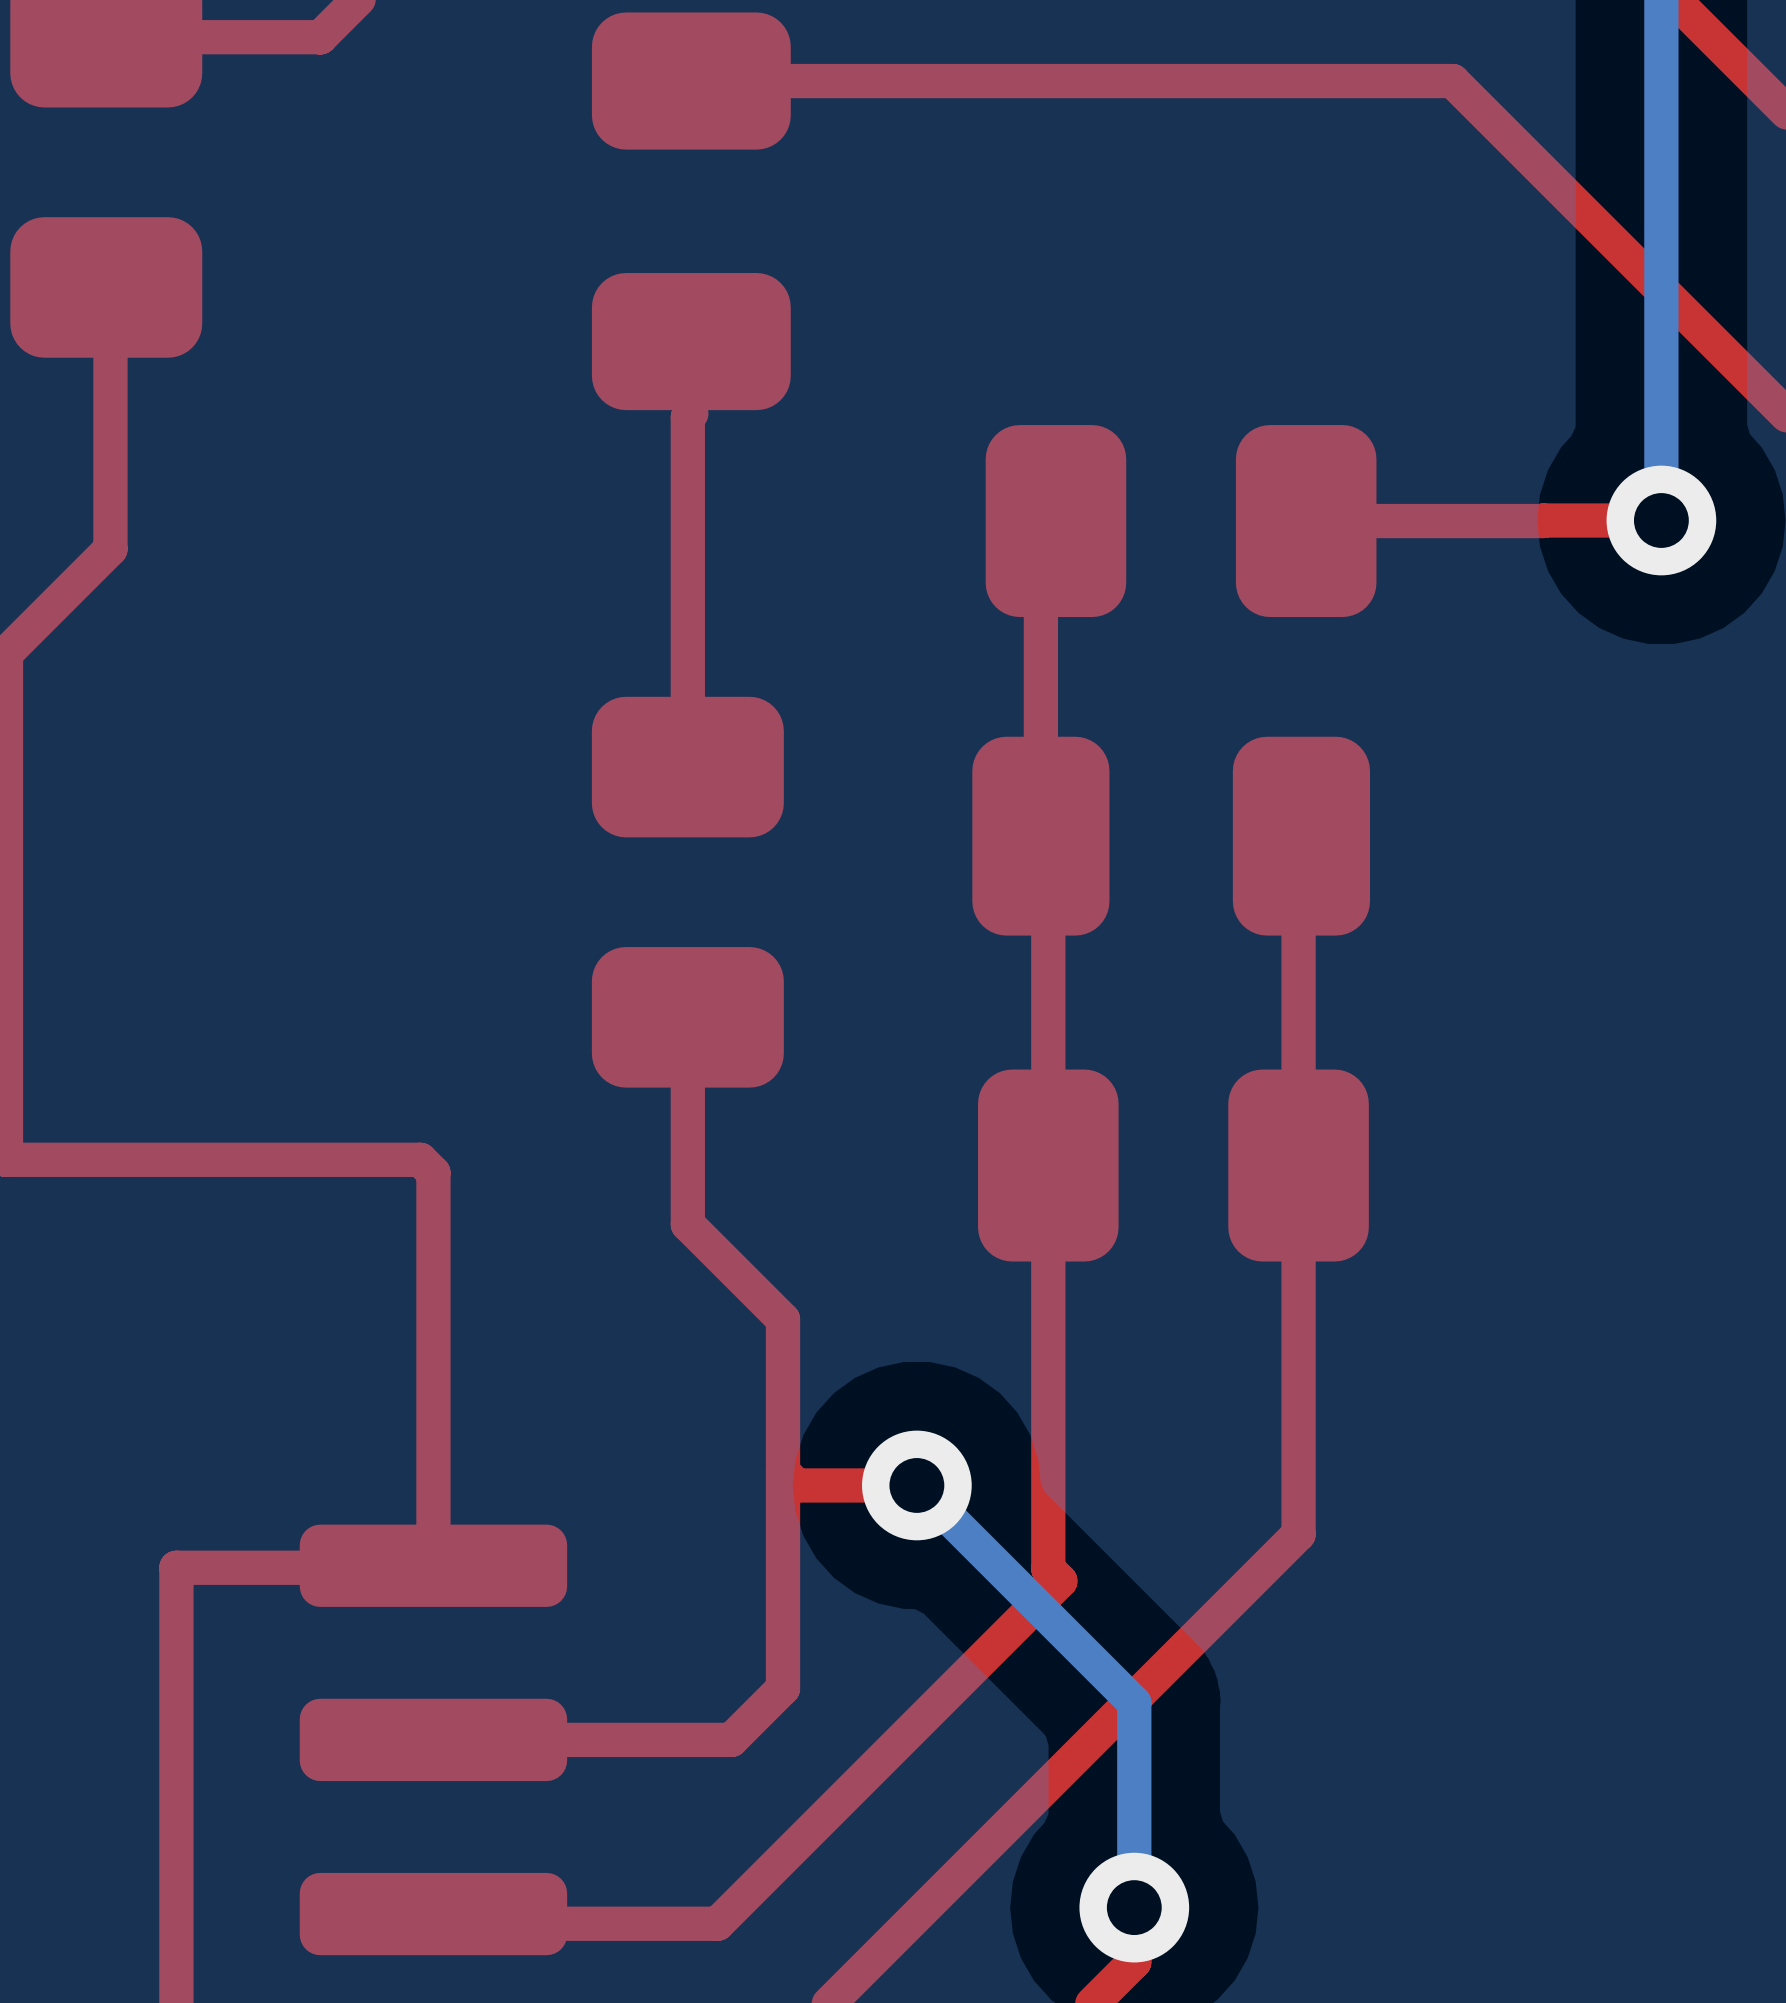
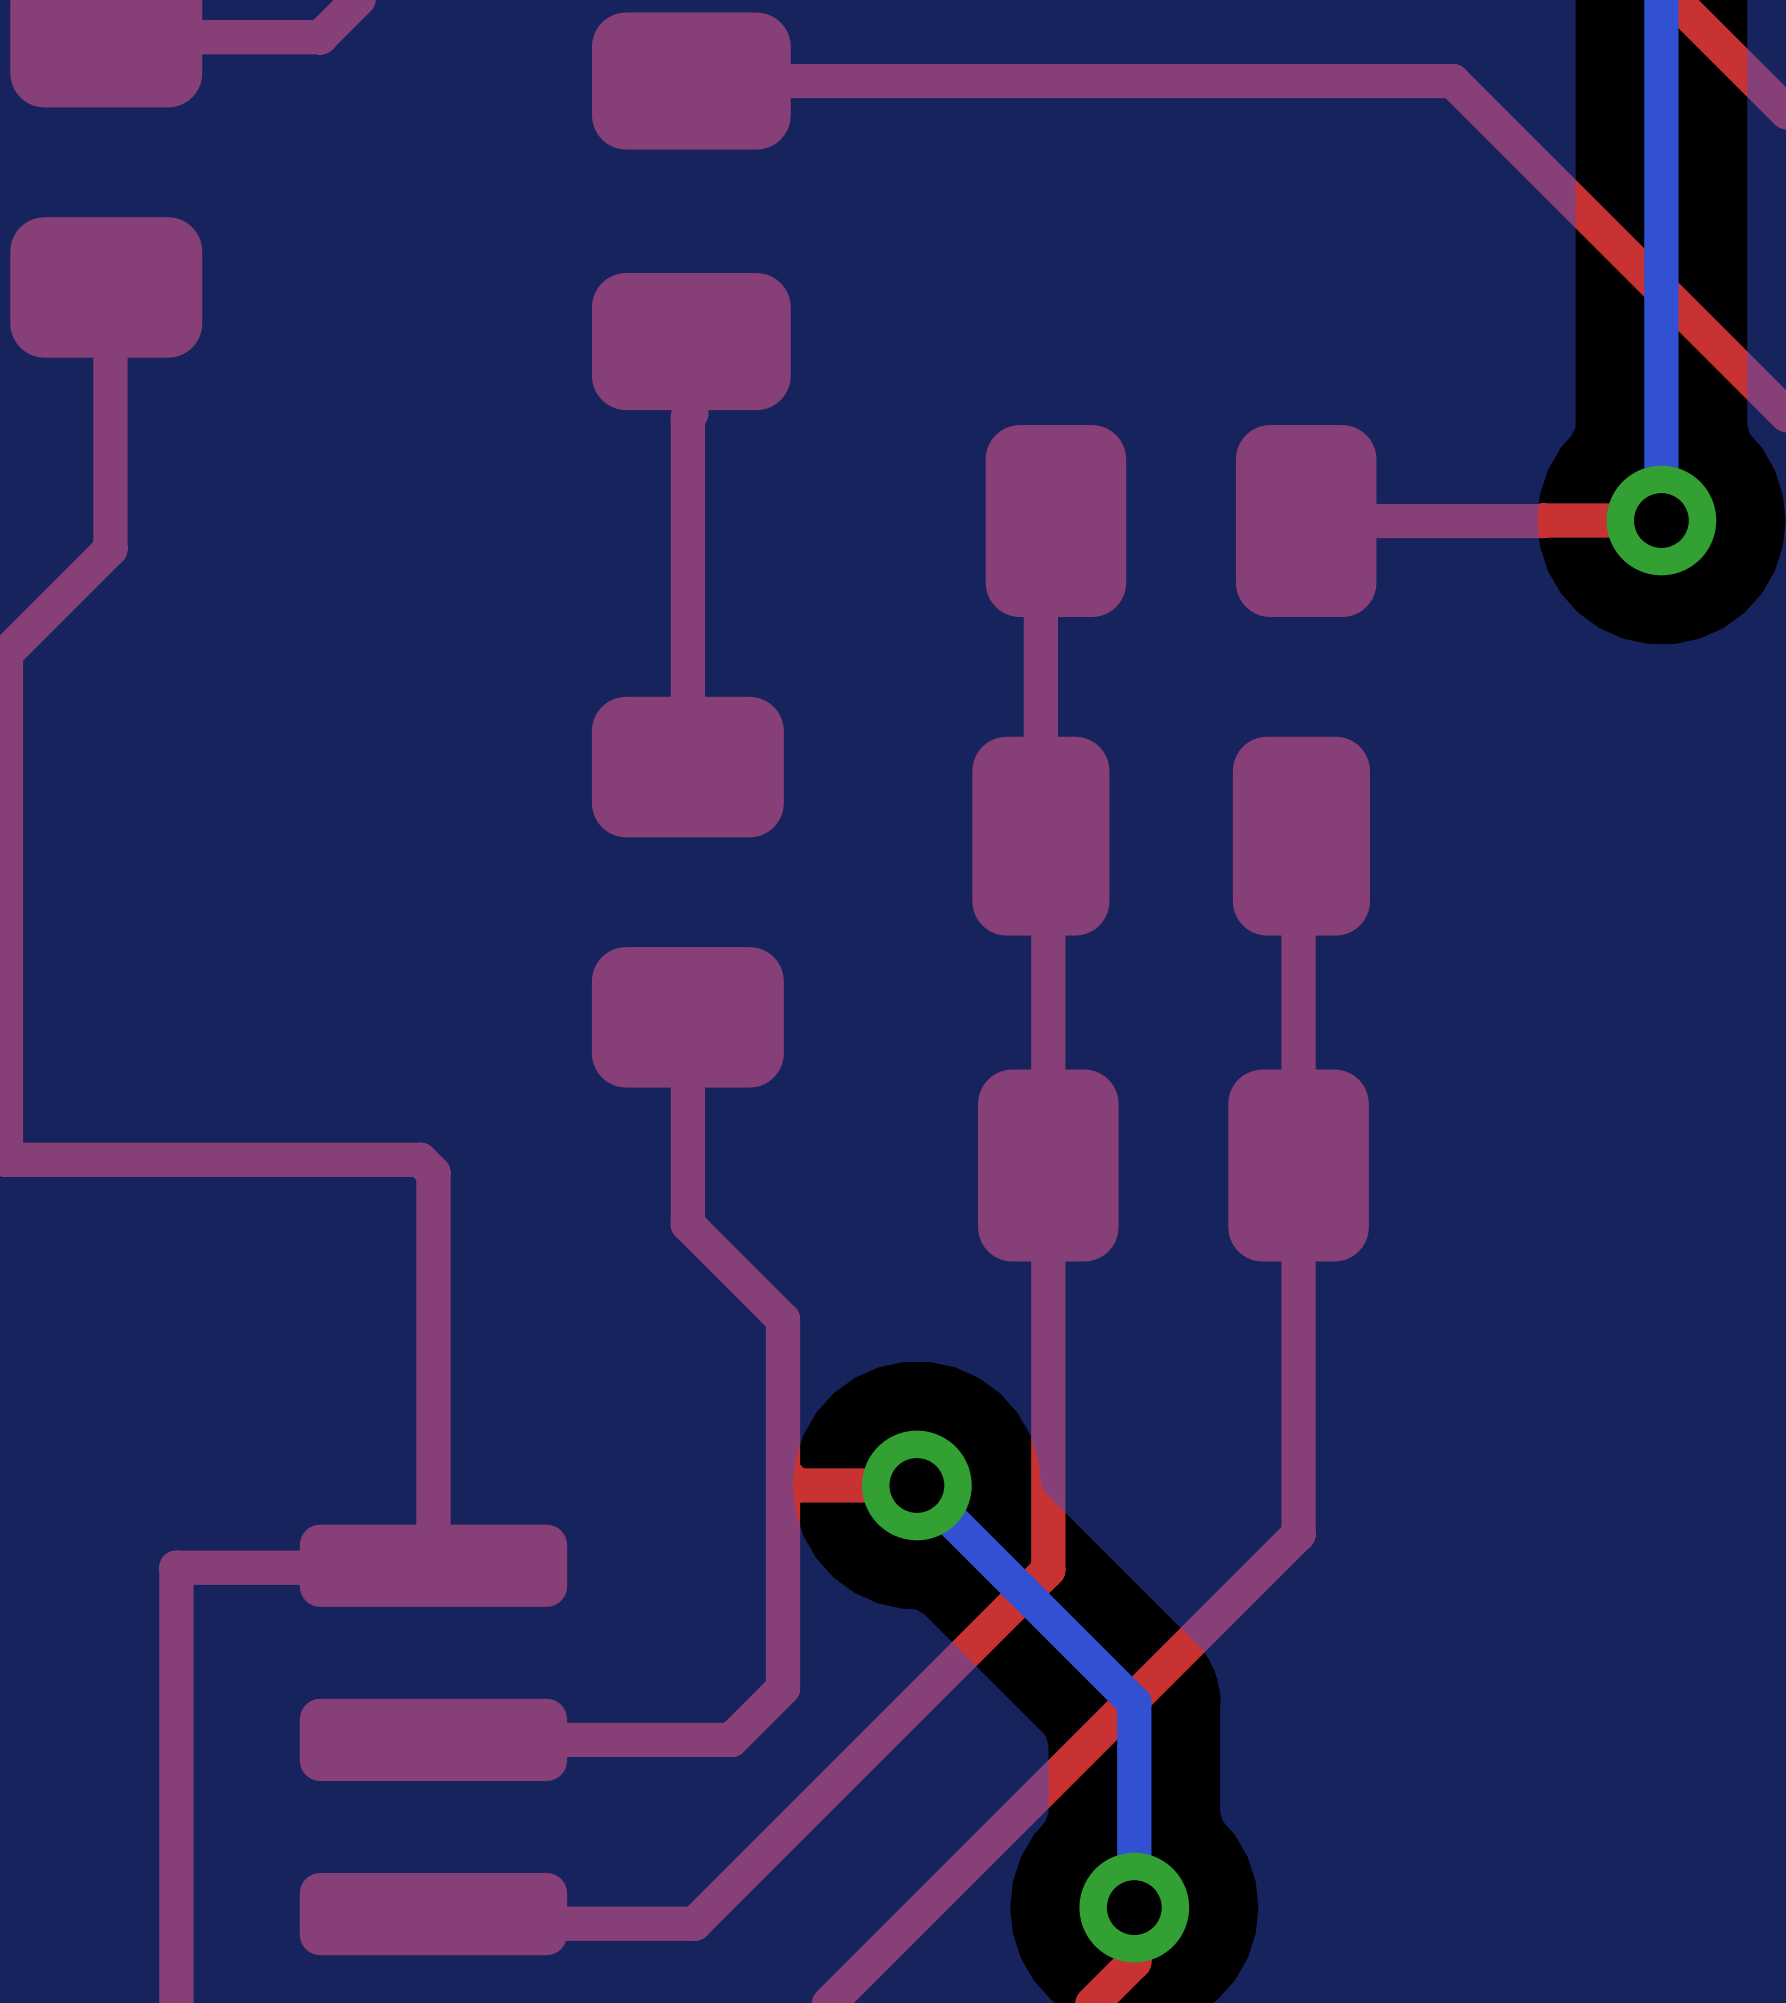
top track: (1048, 1569) (1060, 1581) (717, 1923) (694, 1923) -> (1048, 1569) (694, 1923)

